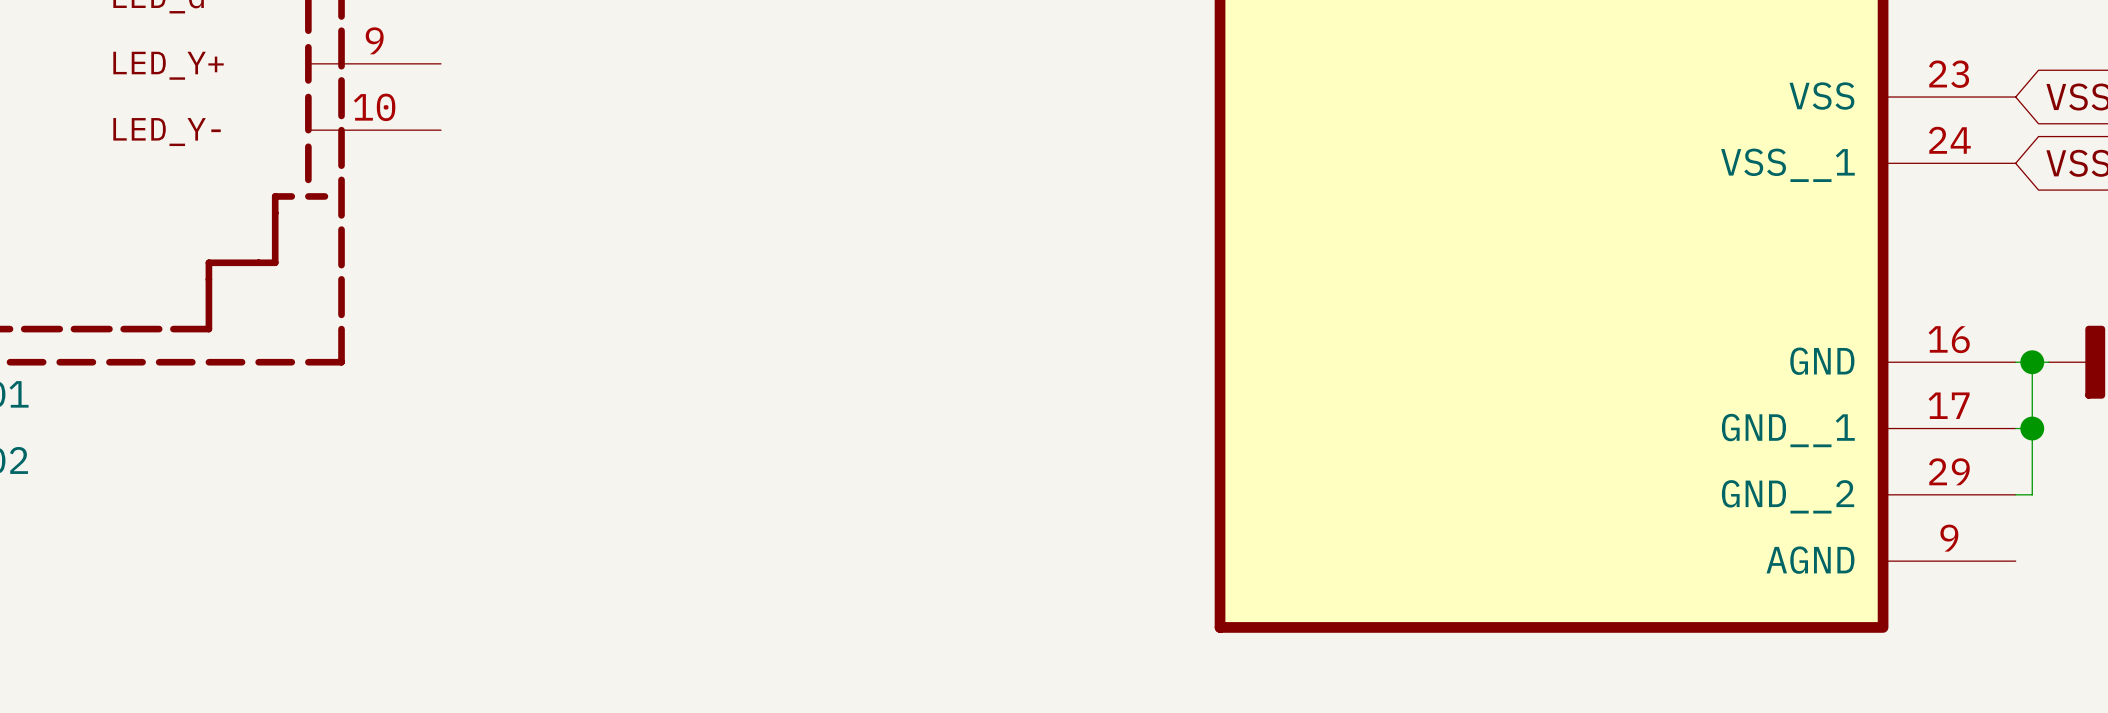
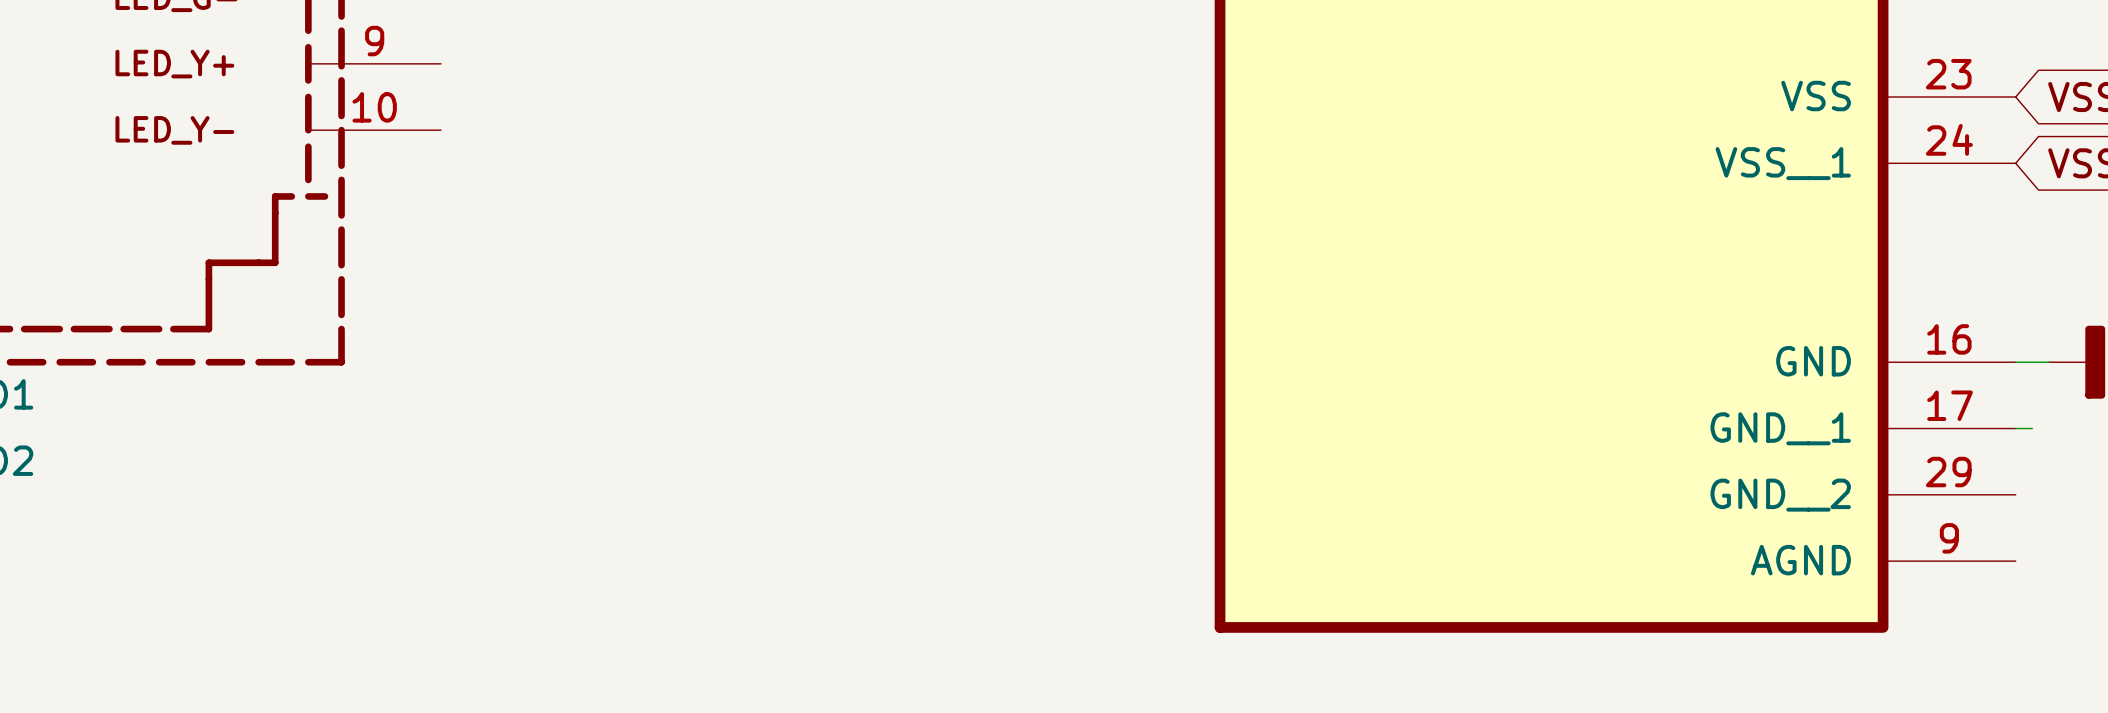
wire: (2032, 362) (2032, 494) (2015, 494) -> none
junction: (2032, 362) -> none
junction: (2032, 428) -> none

